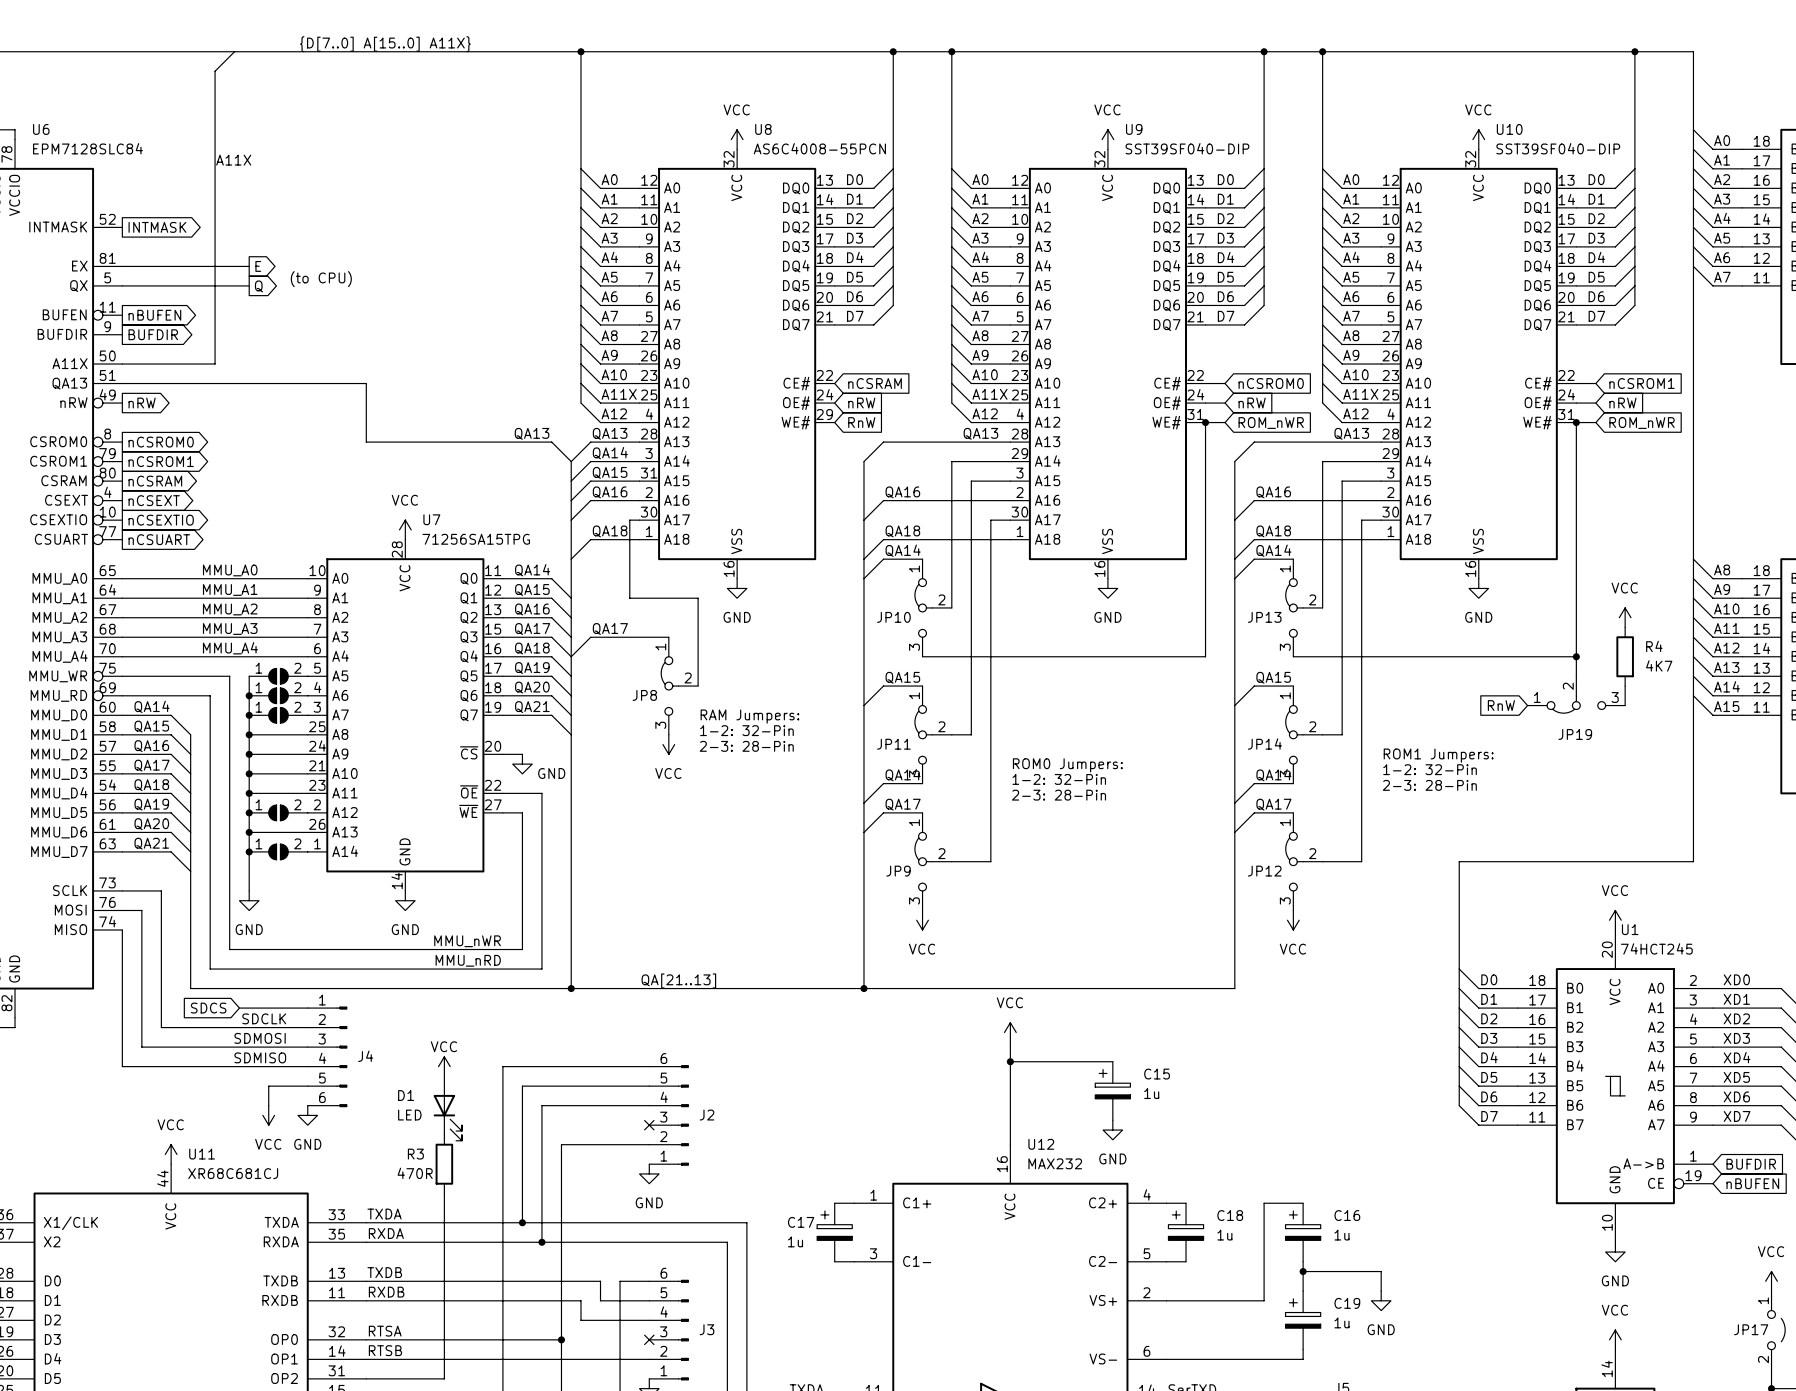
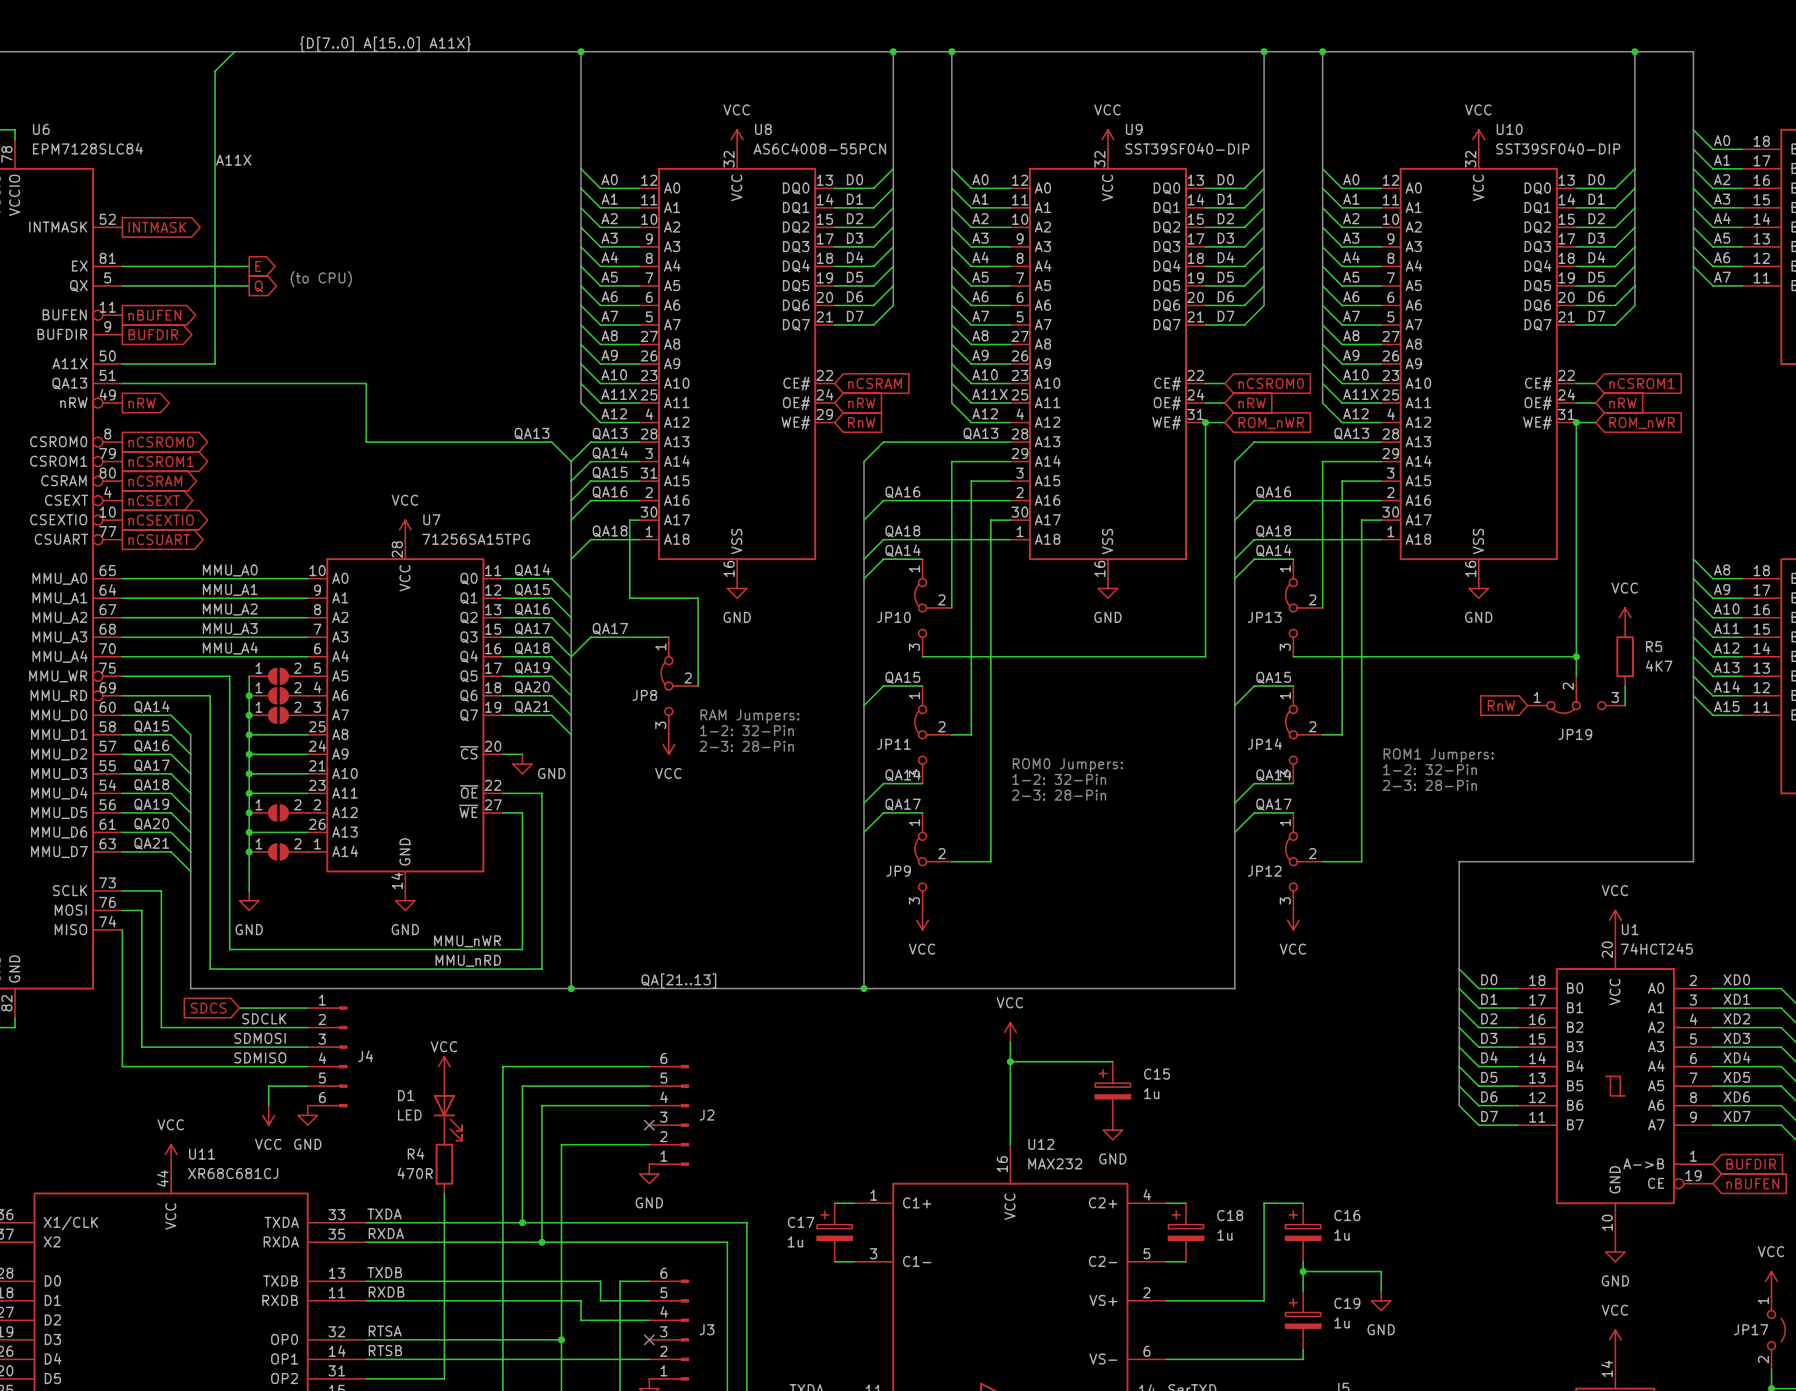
R4 name: R4 (1654, 646) -> R5 (1654, 646)
R3 name: R3 (415, 1154) -> R4 (416, 1153)

